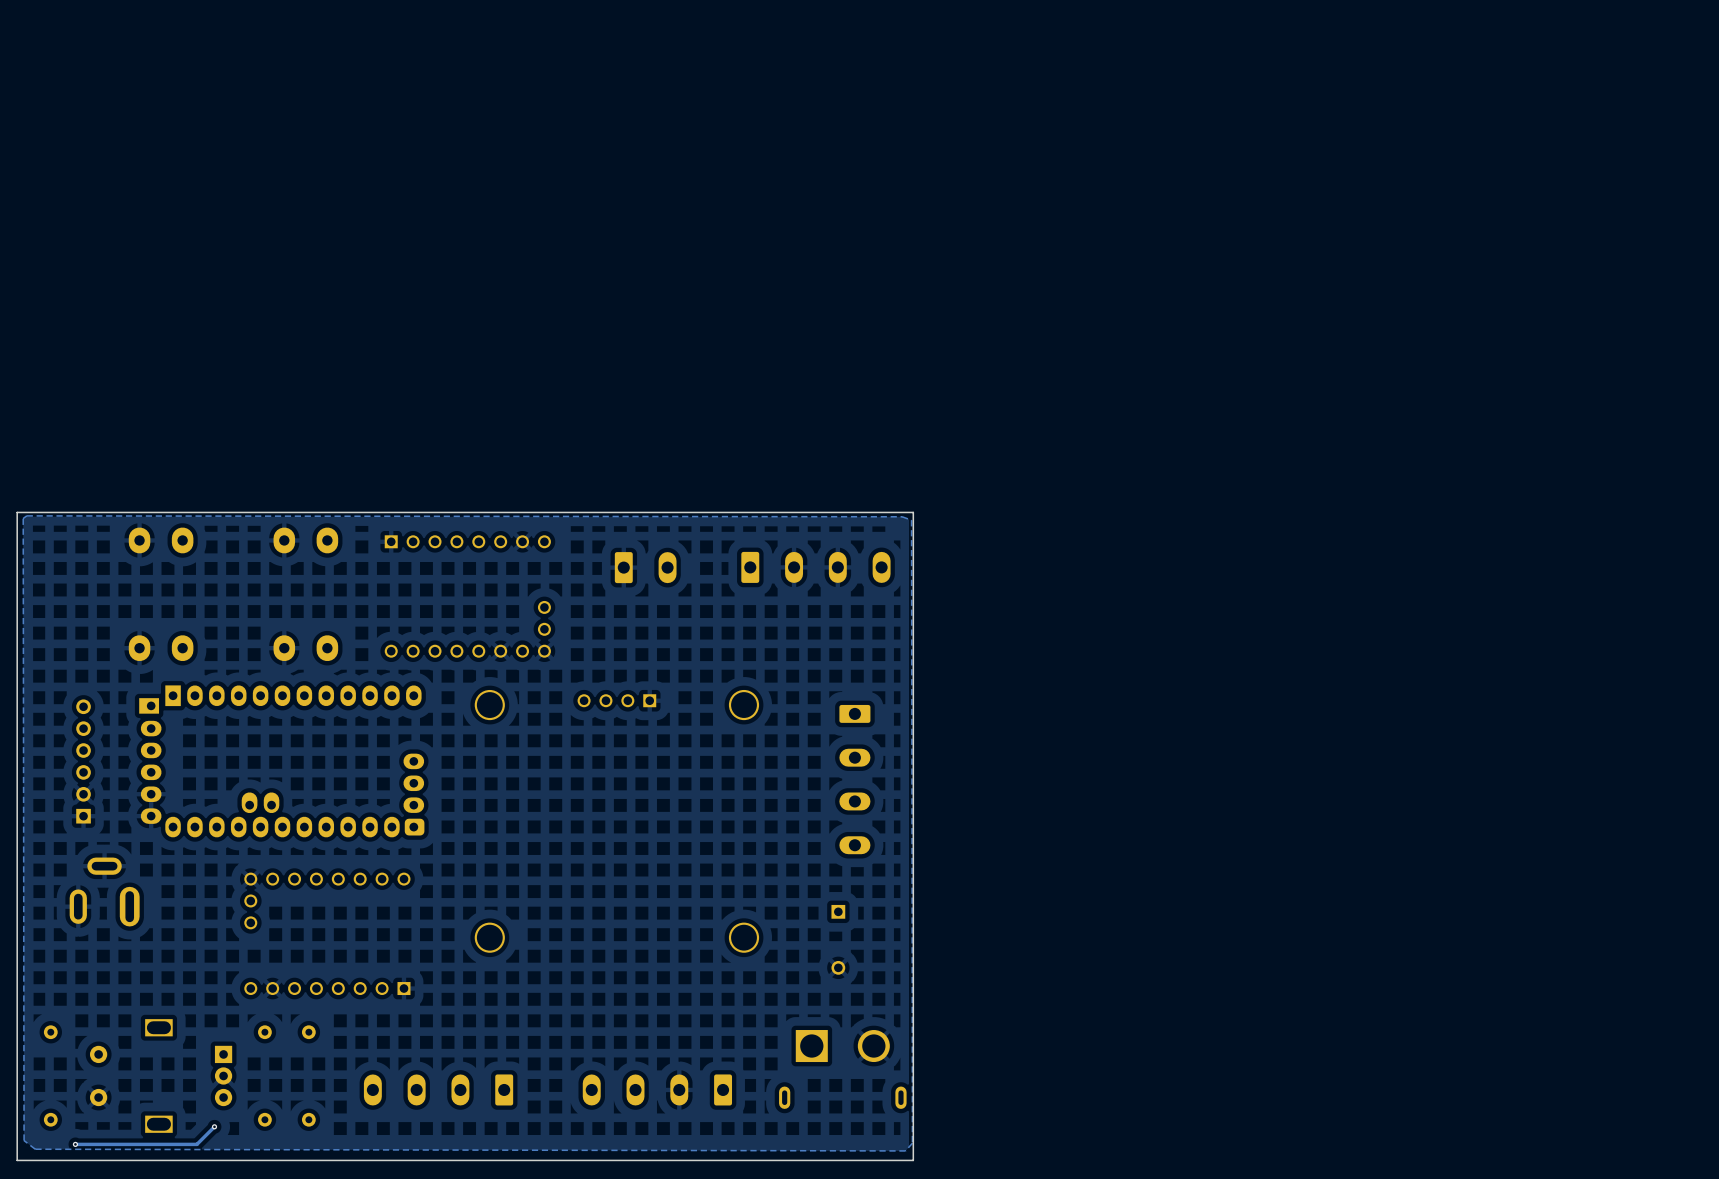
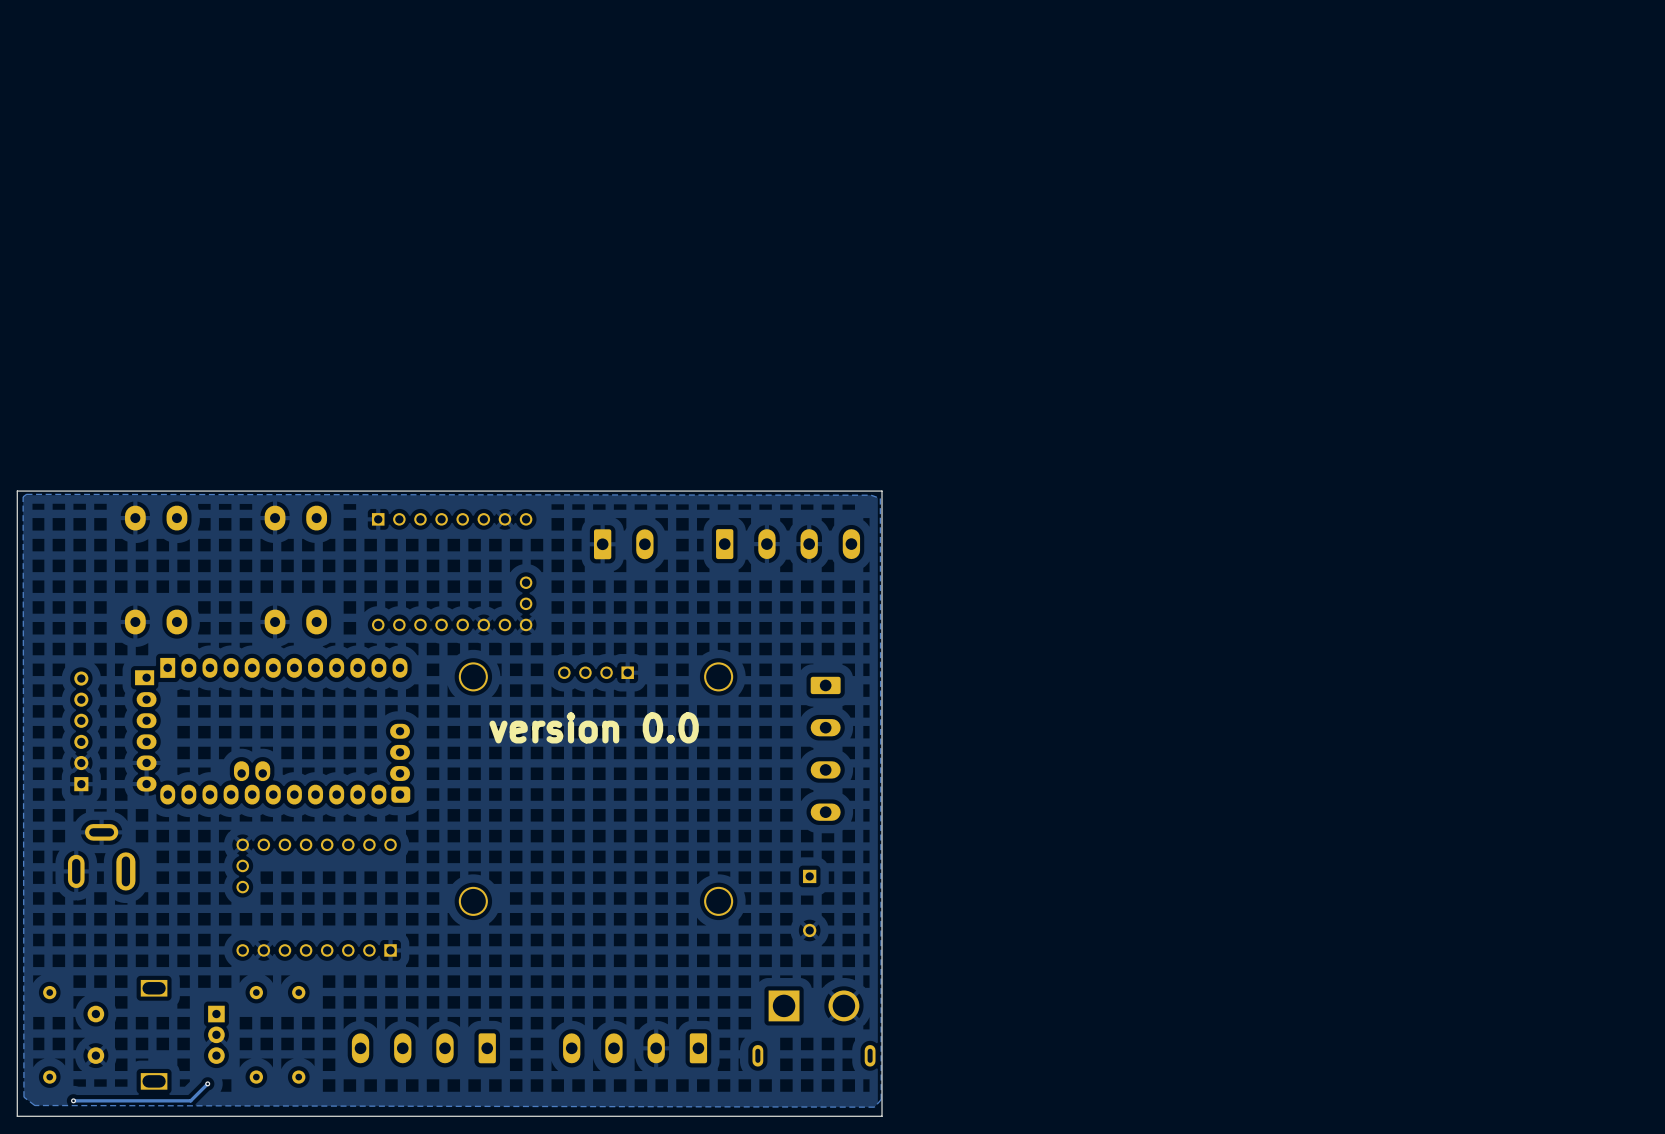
text: none -> version 0.0 (594, 727)

